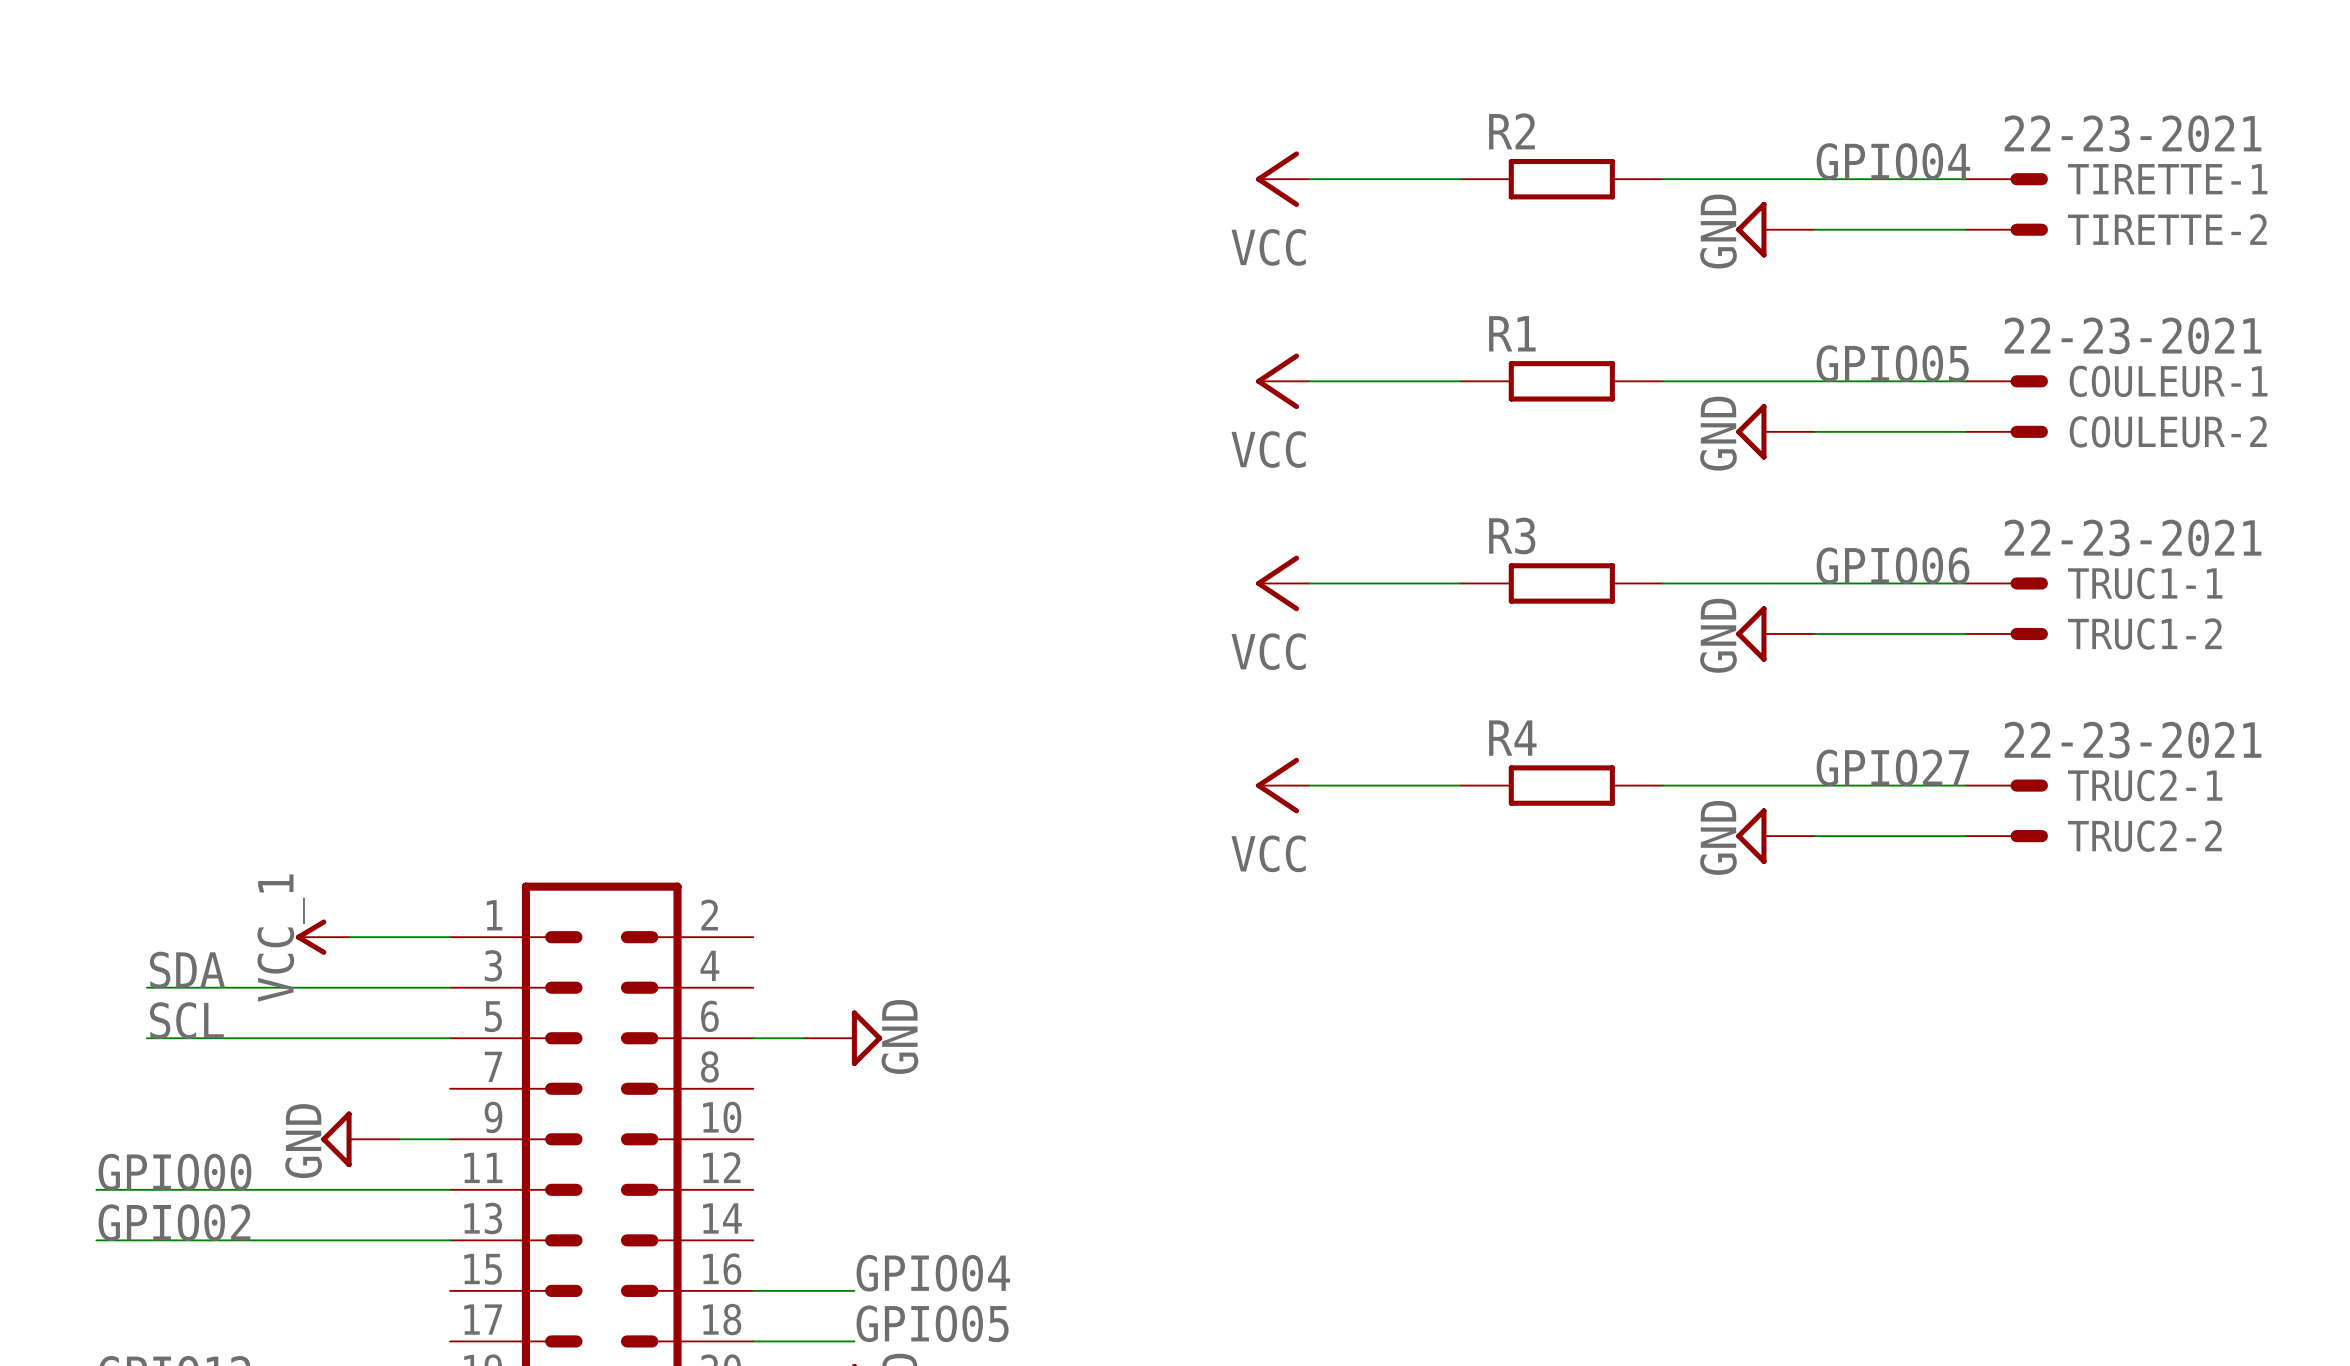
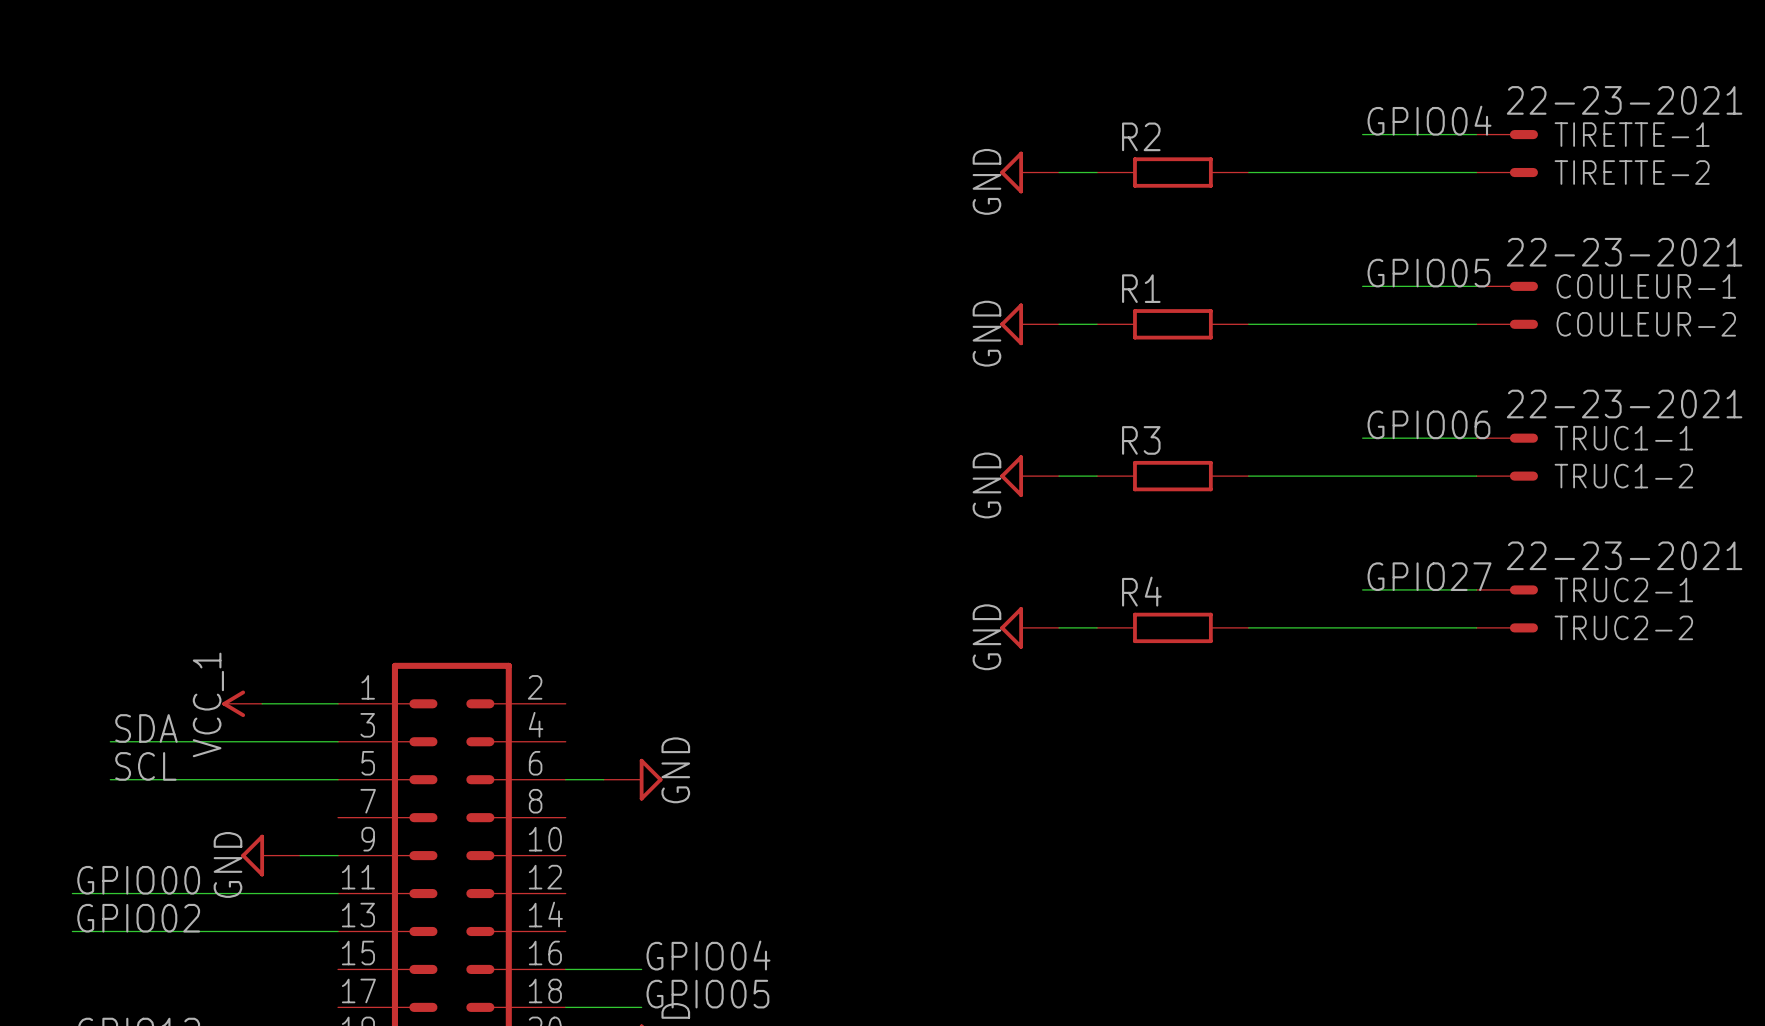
power symbol: VCC (1282, 179) -> none
wire: (1309, 179) (1460, 179) -> none
R2 position: (1561, 179) -> (1172, 172)
wire: (1662, 179) (1814, 179) -> (1248, 172) (1362, 172)
power symbol: none -> GND (1029, 172)
wire: none -> (1059, 172) (1097, 172)
power symbol: GND (1775, 229) -> none
power symbol: VCC (1282, 381) -> none
wire: (1309, 381) (1460, 381) -> none
R1 position: (1561, 381) -> (1172, 324)
wire: (1662, 381) (1814, 381) -> (1248, 324) (1362, 324)
power symbol: none -> GND (1029, 324)
wire: none -> (1059, 324) (1097, 324)
power symbol: GND (1775, 431) -> none
power symbol: VCC (1282, 583) -> none
wire: (1309, 583) (1460, 583) -> none
R3 position: (1561, 583) -> (1172, 476)
wire: (1662, 583) (1814, 583) -> (1248, 476) (1362, 476)
power symbol: none -> GND (1029, 476)
wire: none -> (1059, 476) (1097, 476)
power symbol: GND (1775, 633) -> none
power symbol: VCC (1282, 785) -> none
wire: (1309, 785) (1460, 785) -> none
R4 position: (1561, 785) -> (1172, 627)
wire: (1662, 785) (1814, 785) -> (1248, 627) (1362, 627)
power symbol: none -> GND (1029, 627)
wire: none -> (1059, 627) (1097, 627)
power symbol: GND (1775, 836) -> none

